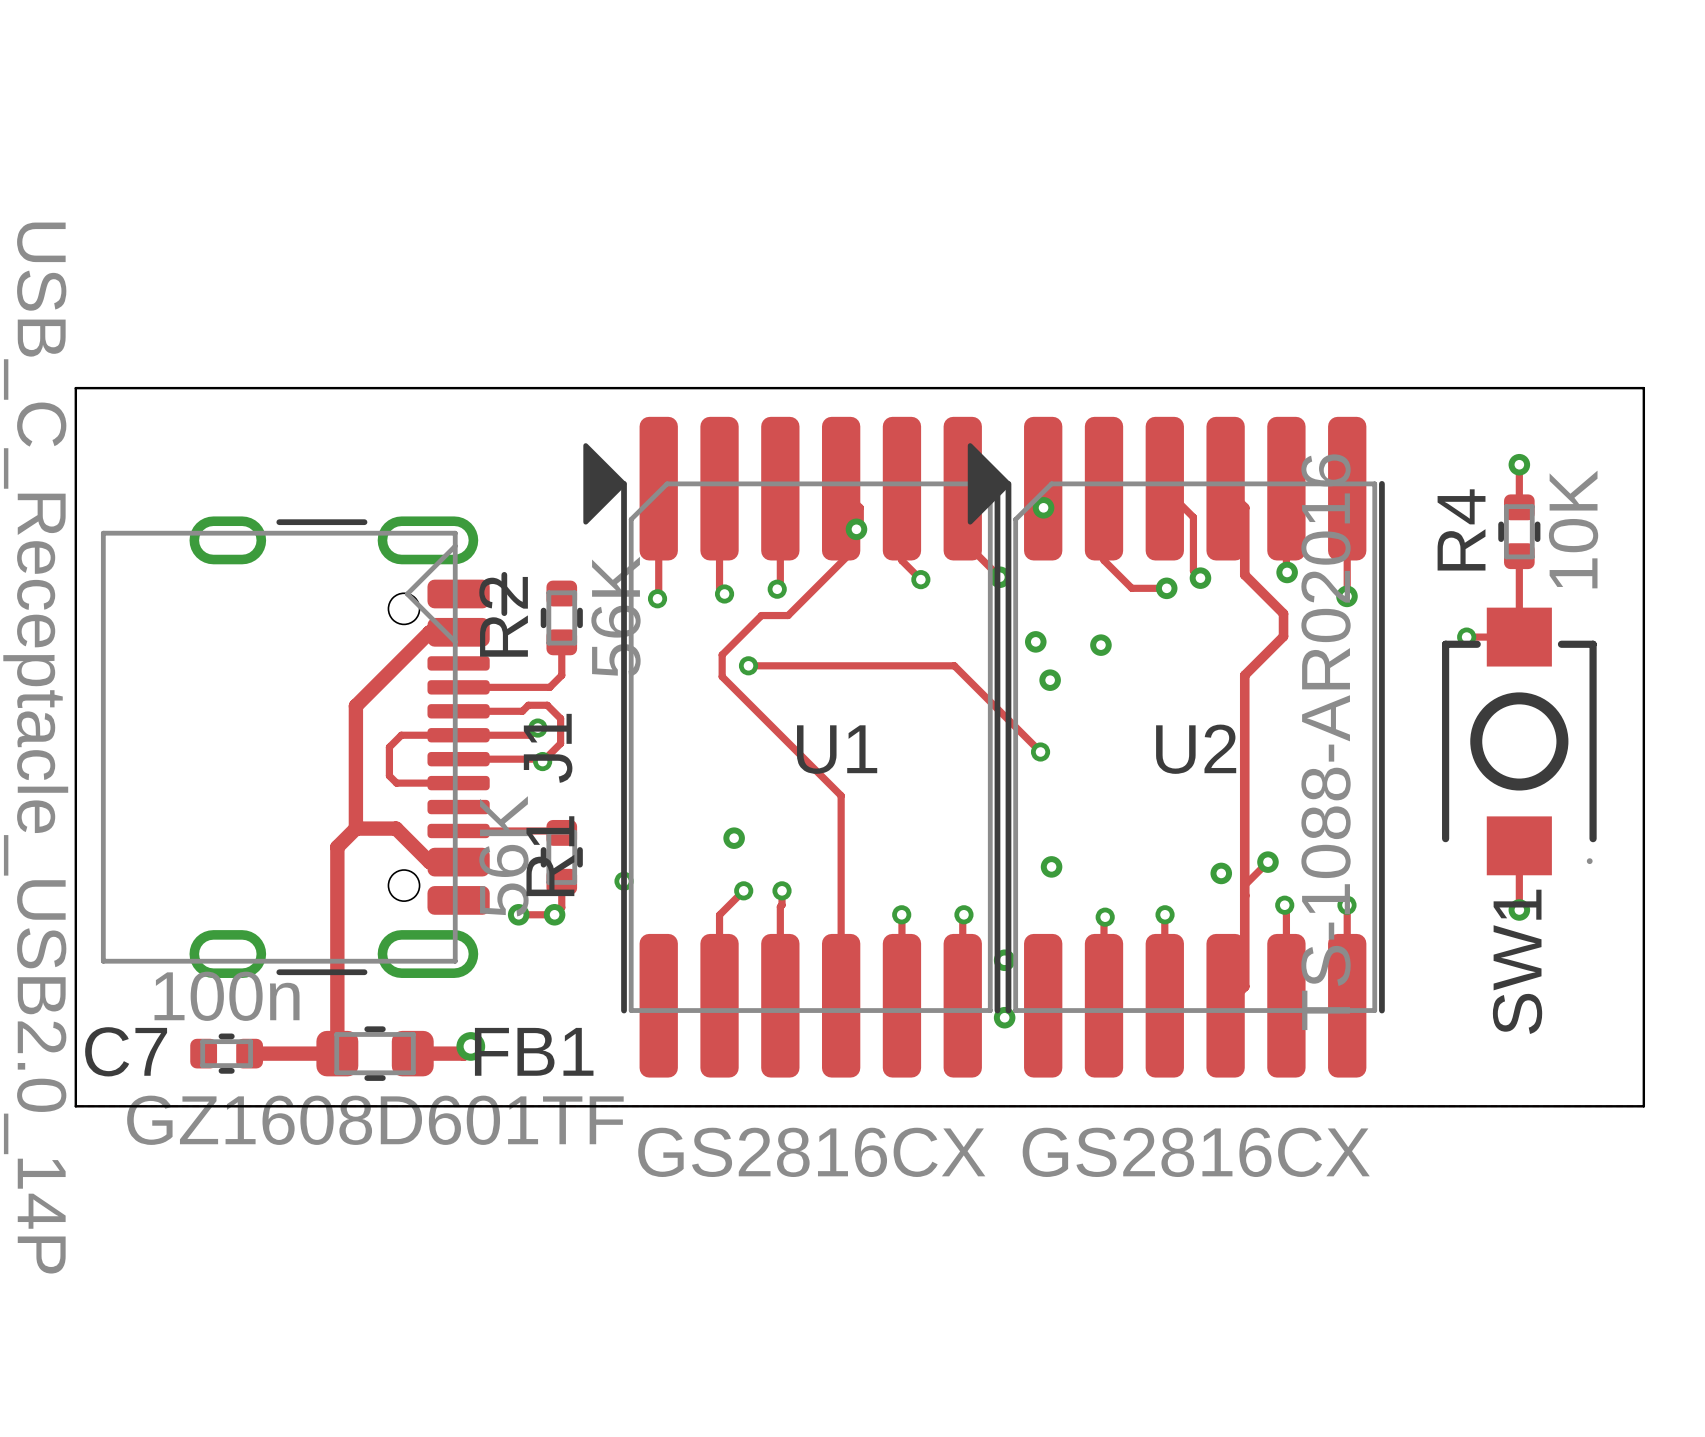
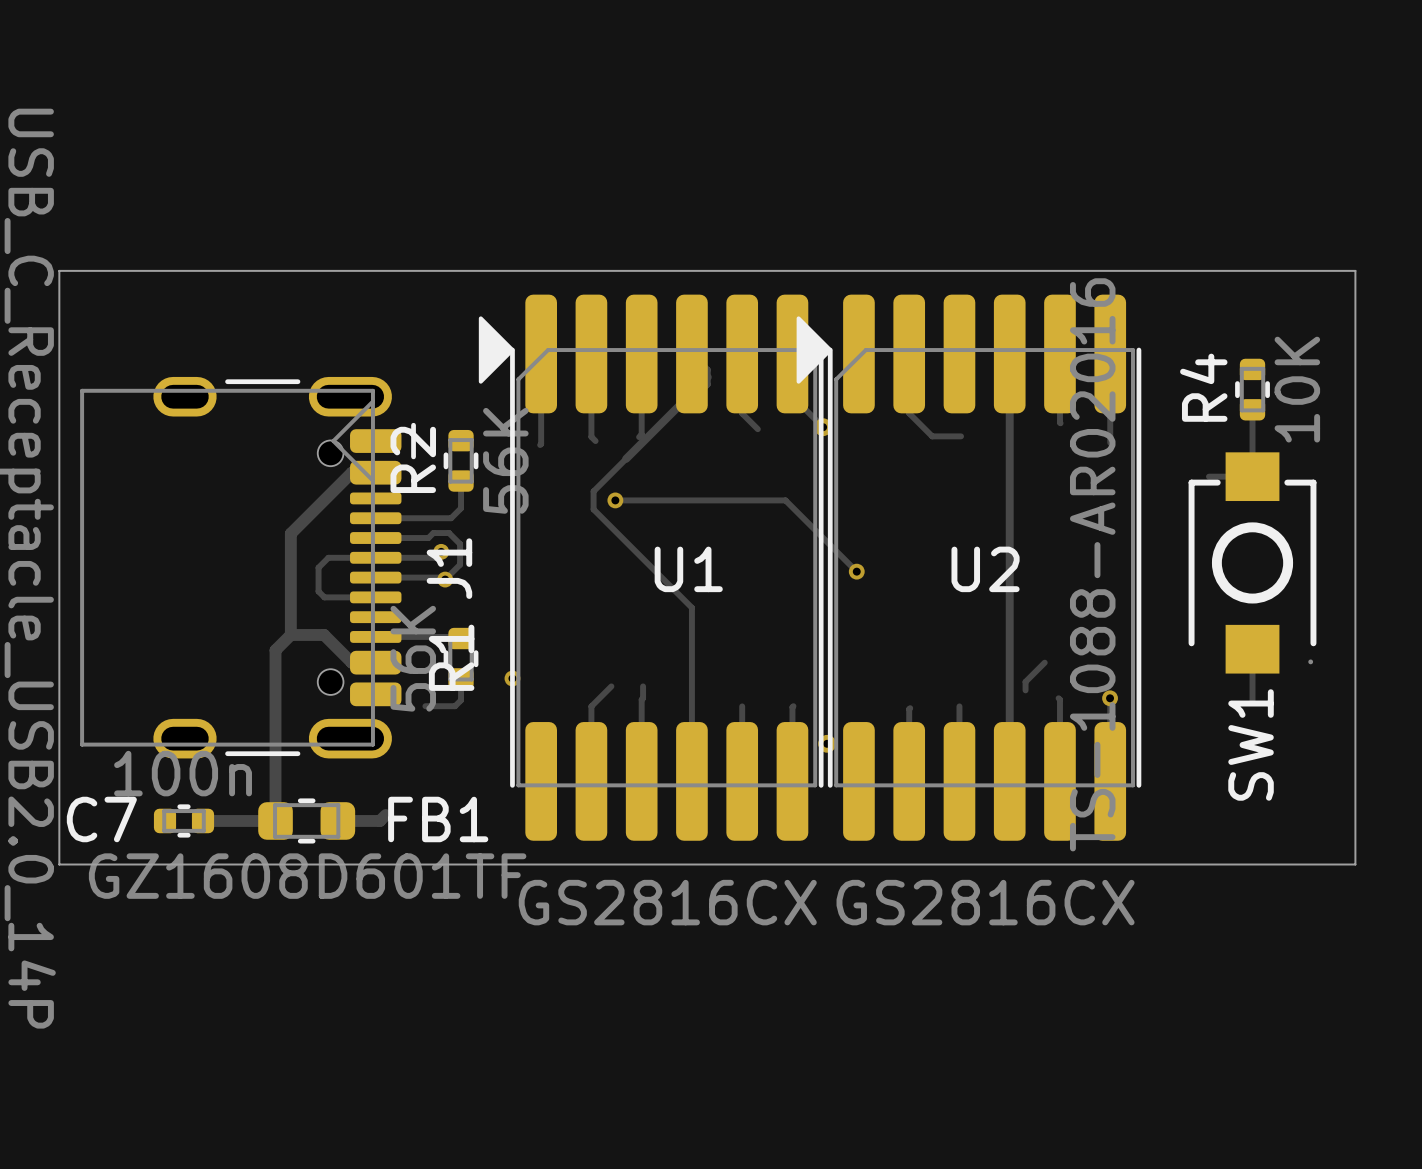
track: (1519, 464) (1519, 507) -> none
via: (1519, 464) -> none
track: (1164, 488) (1193, 517) (1193, 571) (1200, 578) -> none
track: (1225, 488) (1244, 507) (1244, 574) (1283, 613) (1283, 636) (1244, 675) (1244, 986) (1225, 1005) -> (1009, 353) (1009, 781)
via: (1043, 507) -> none
via: (856, 529) -> none
track: (856, 547) (788, 615) (761, 615) -> (707, 377) (626, 458)
via: (1287, 572) -> none
via: (1200, 578) -> none
via: (920, 579) -> none
via: (1166, 588) -> none
via: (777, 589) -> none
via: (724, 593) -> none
via: (1346, 596) -> none
via: (657, 598) -> none
via: (1466, 637) -> none
via: (1035, 641) -> none
via: (1100, 645) -> none
via: (1050, 680) -> none
via: (734, 838) -> none
via: (1267, 862) -> none
via: (1051, 866) -> none
via: (1221, 873) -> none
via: (743, 890) -> none
via: (782, 890) -> none
via: (1284, 905) -> none
via: (1519, 909) -> none
via: (518, 914) -> none
via: (554, 914) -> none
via: (901, 914) -> none
via: (963, 914) -> none
via: (1165, 914) -> none
via: (1105, 917) -> none
via: (1004, 1017) -> none
via: (470, 1046) -> none

